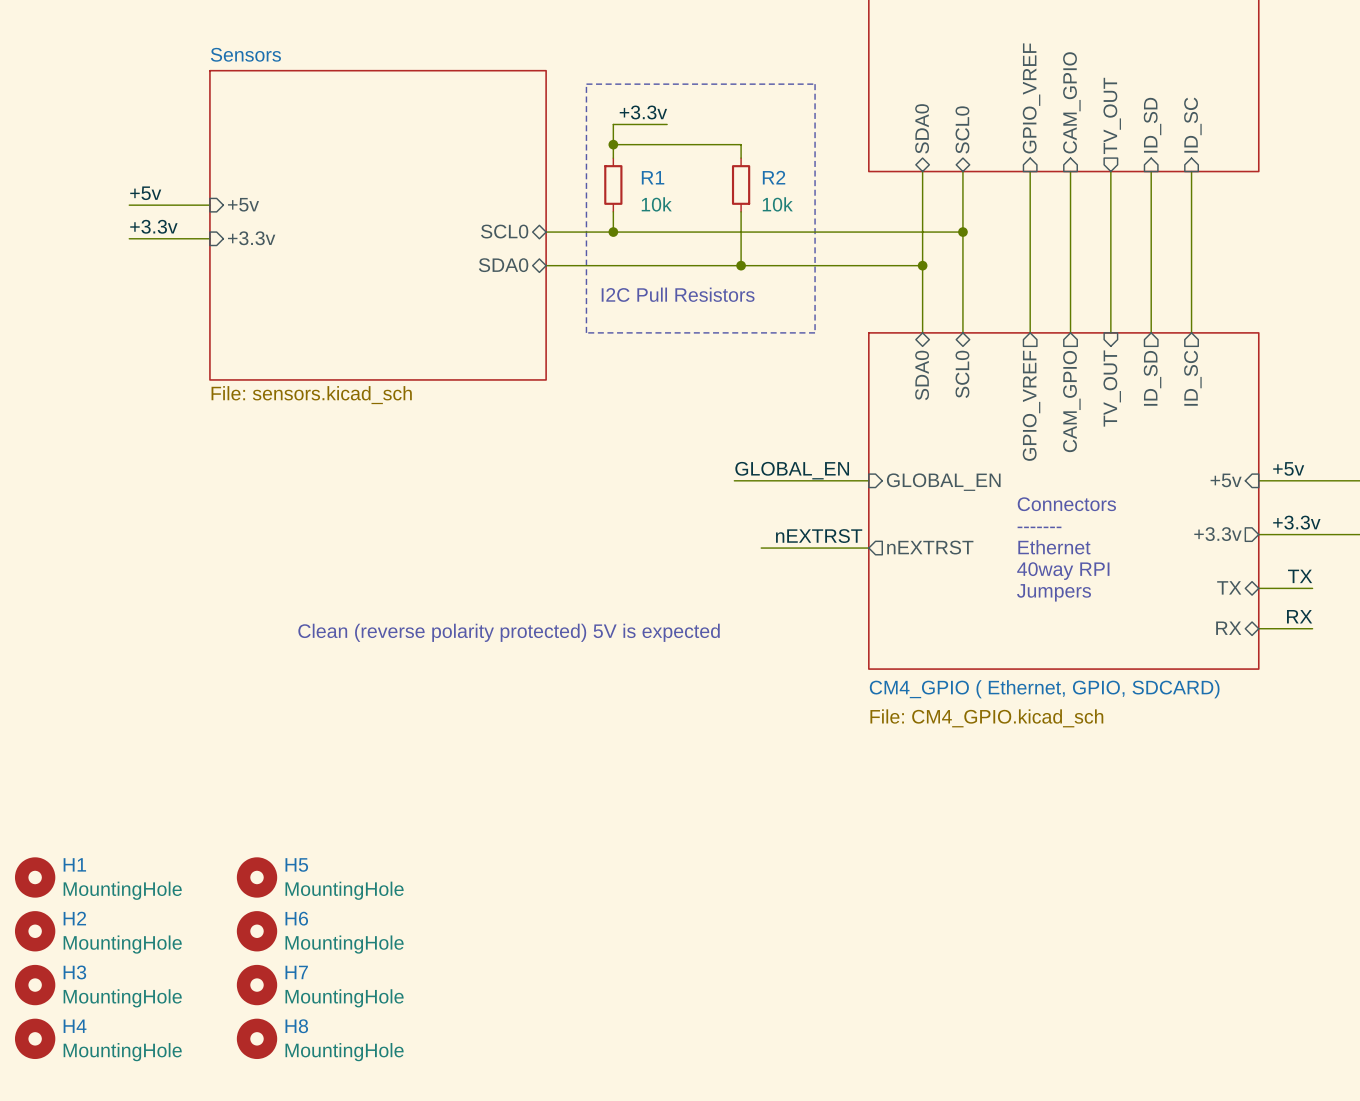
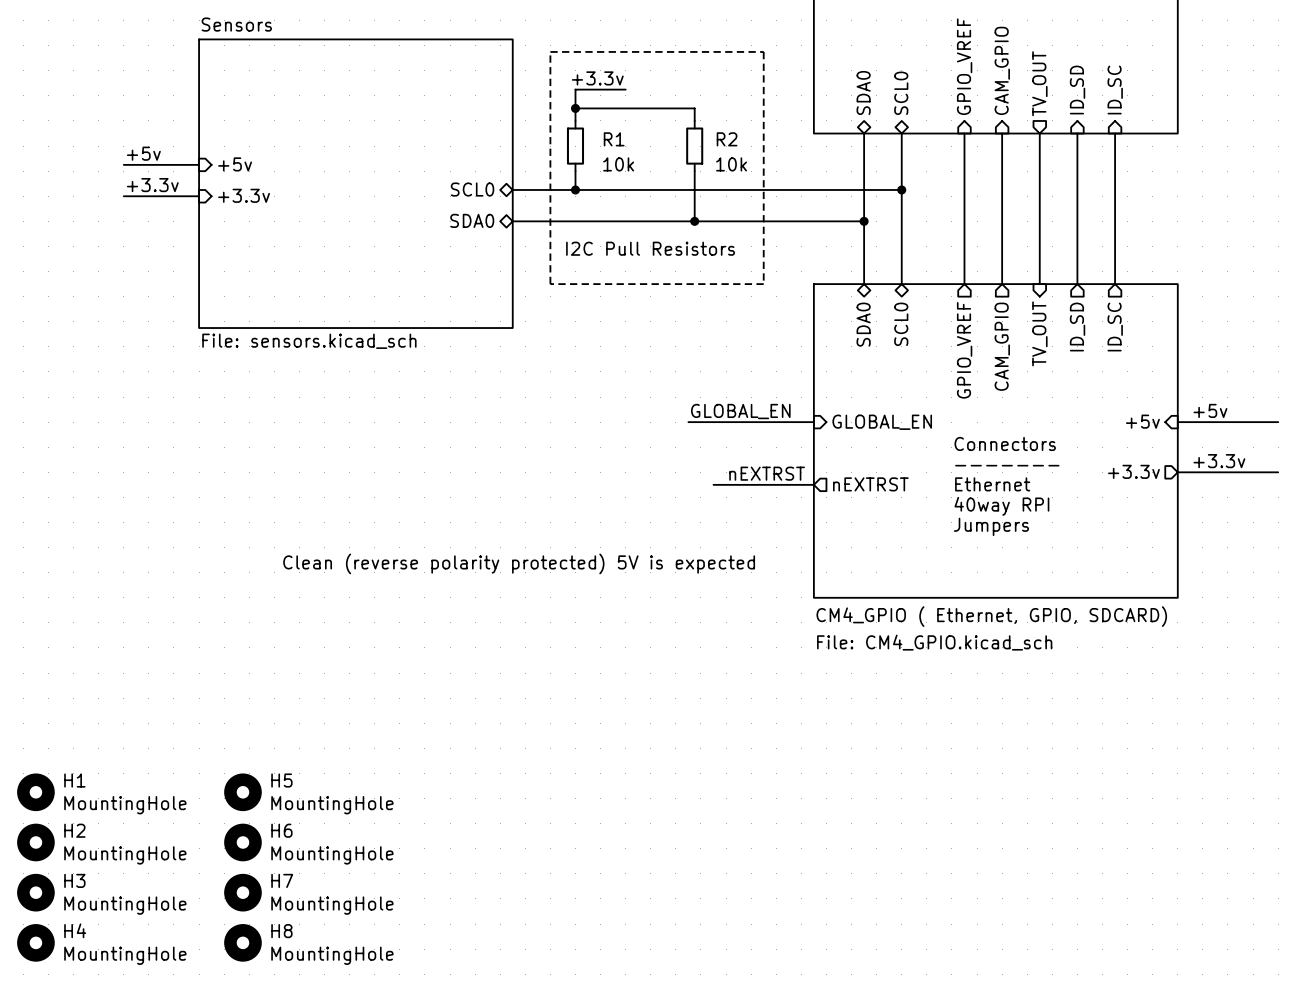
label: TX (1300, 576) -> none
sheet pin: TX (1229, 587) -> none
wire: (1258, 588) (1312, 588) -> none
label: RX (1299, 616) -> none
sheet pin: RX (1228, 628) -> none
wire: (1258, 628) (1312, 628) -> none

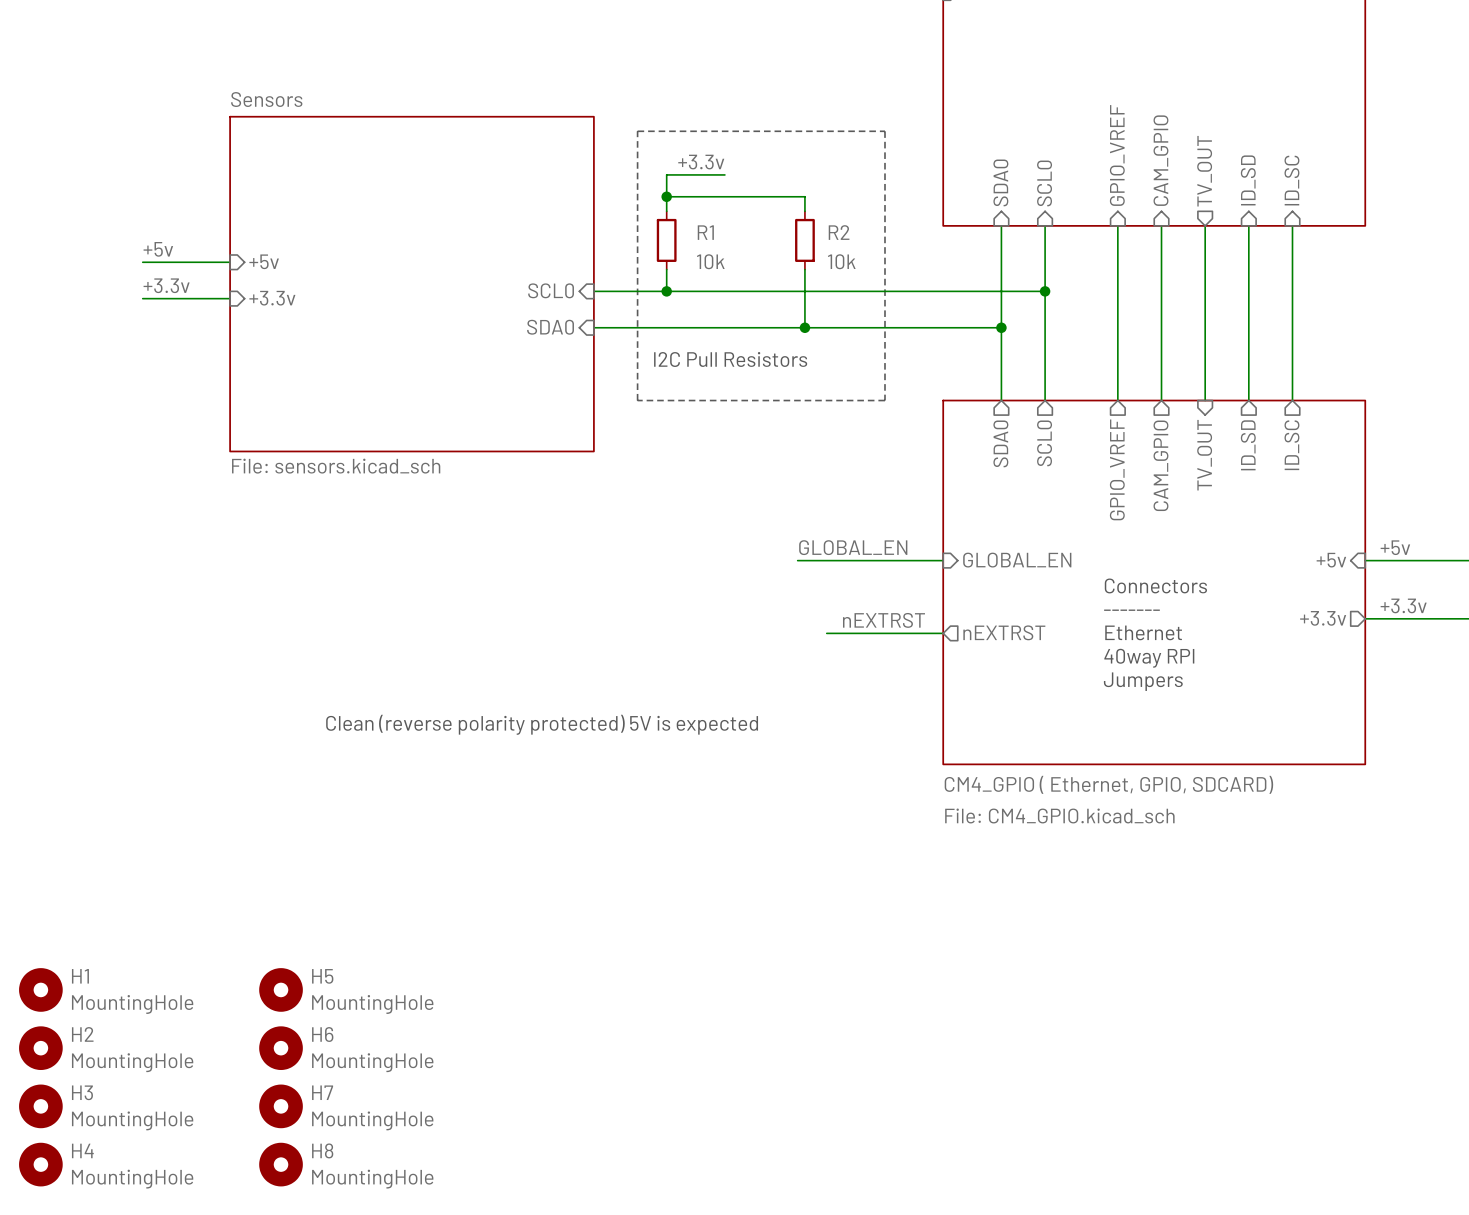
sheet pin shape: bidirectional (863, 92) -> input (1000, 182)
sheet pin shape: bidirectional (901, 93) -> input (1044, 183)
sheet pin shape: bidirectional (472, 189) -> input (551, 290)
sheet pin shape: bidirectional (472, 220) -> input (550, 327)
sheet pin shape: bidirectional (863, 324) -> output (1000, 443)
sheet pin shape: bidirectional (901, 324) -> output (1044, 443)

